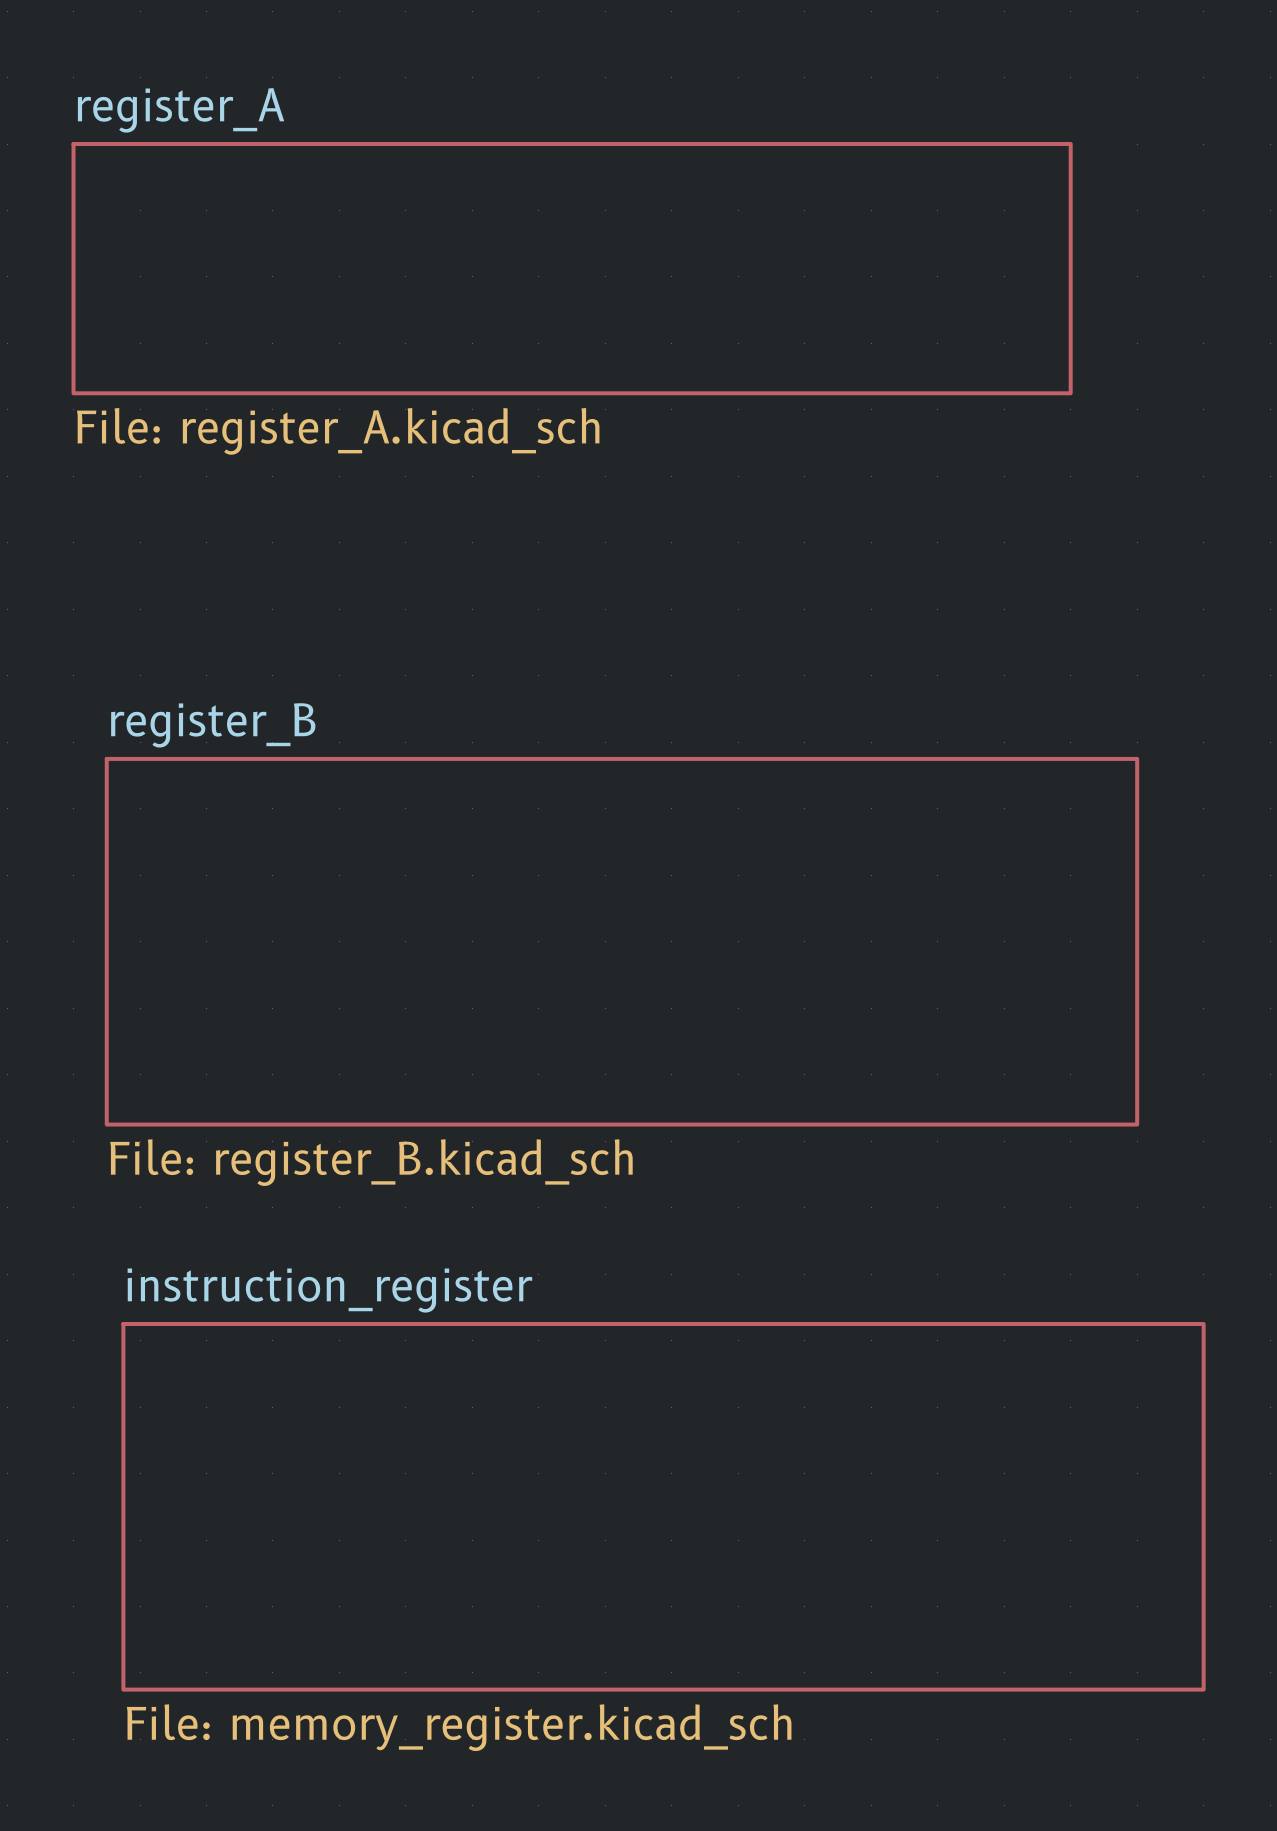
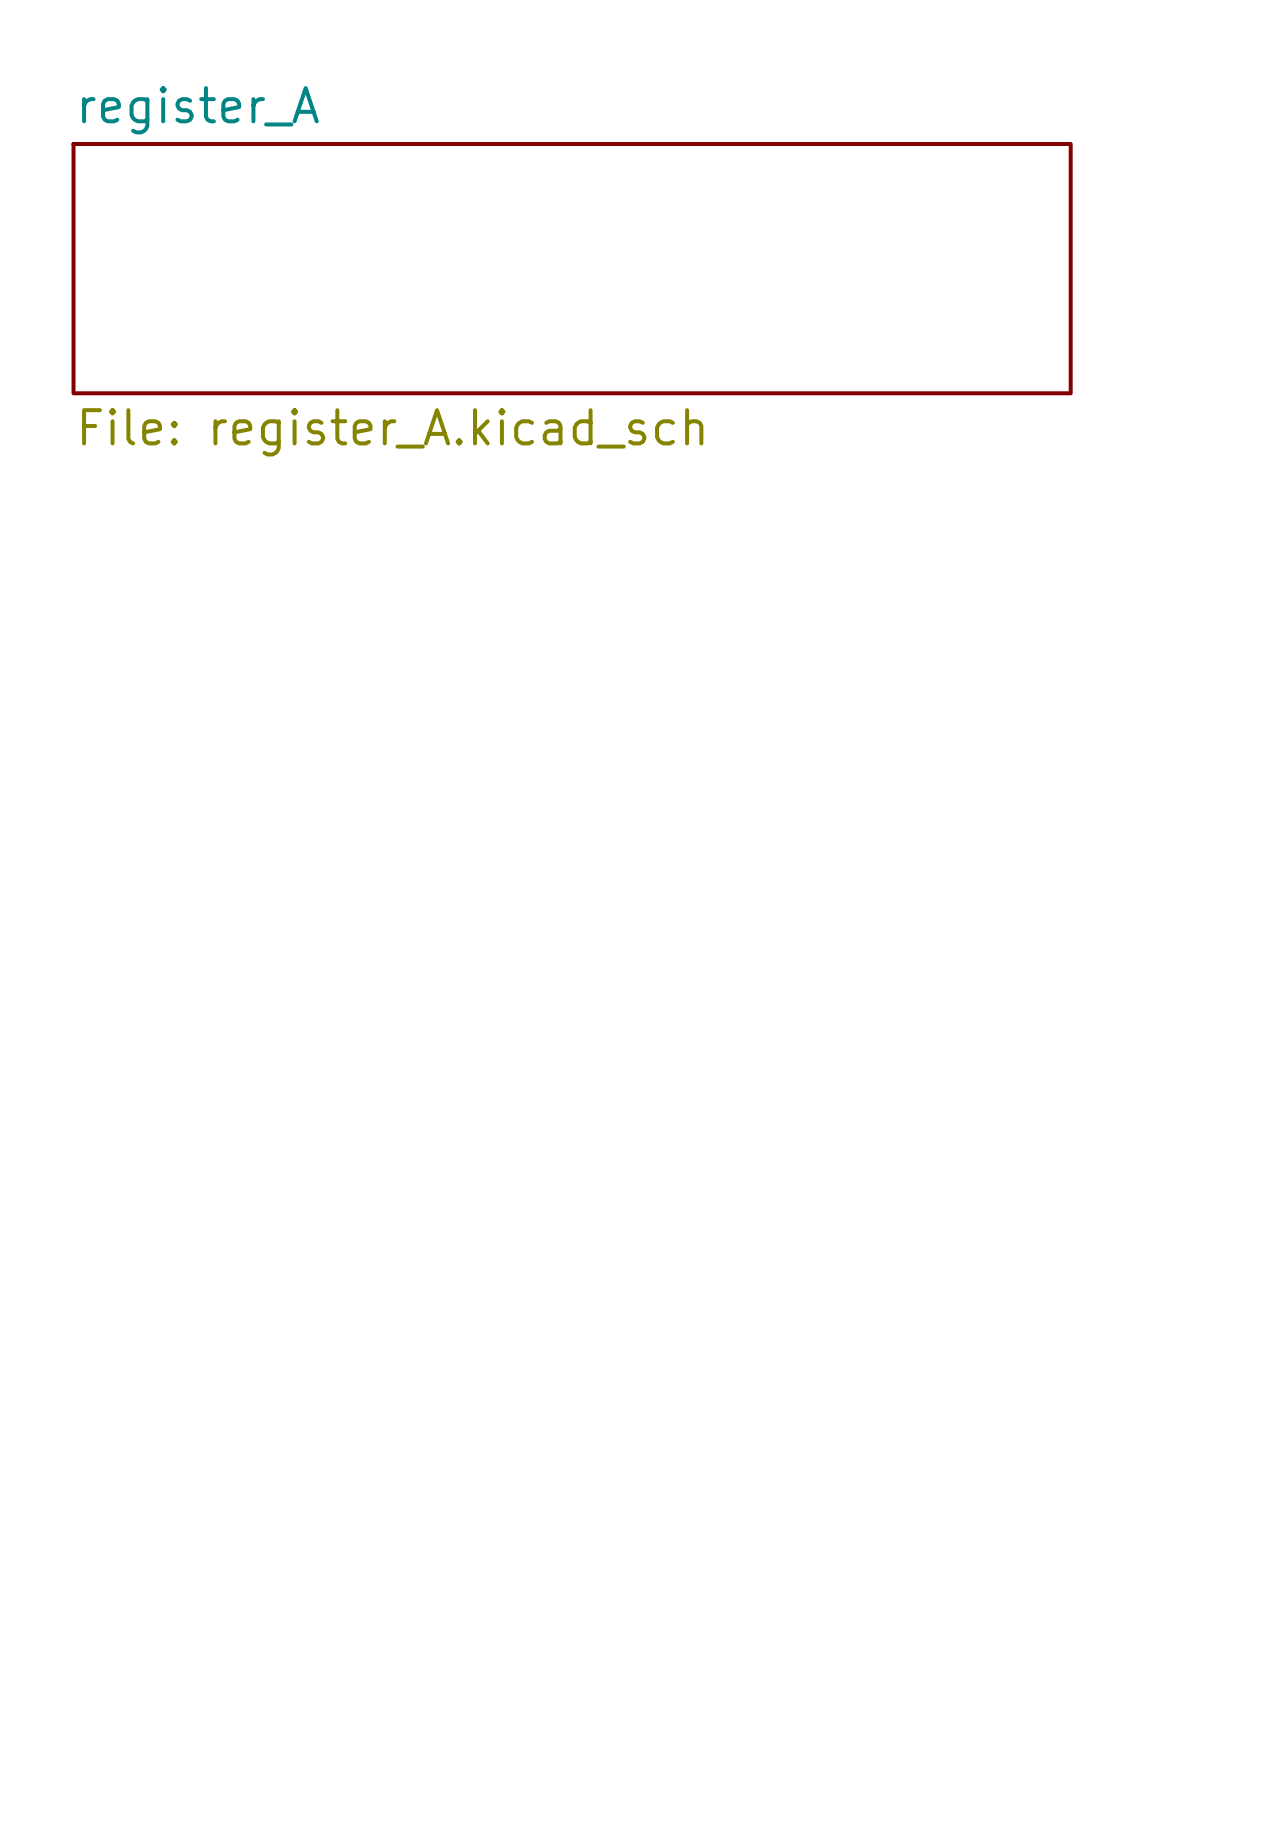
sheet register_B: File: register_B.kicad_sch (621, 941) -> none
sheet instruction_register: File: memory_register.kicad_sch (663, 1506) -> none

